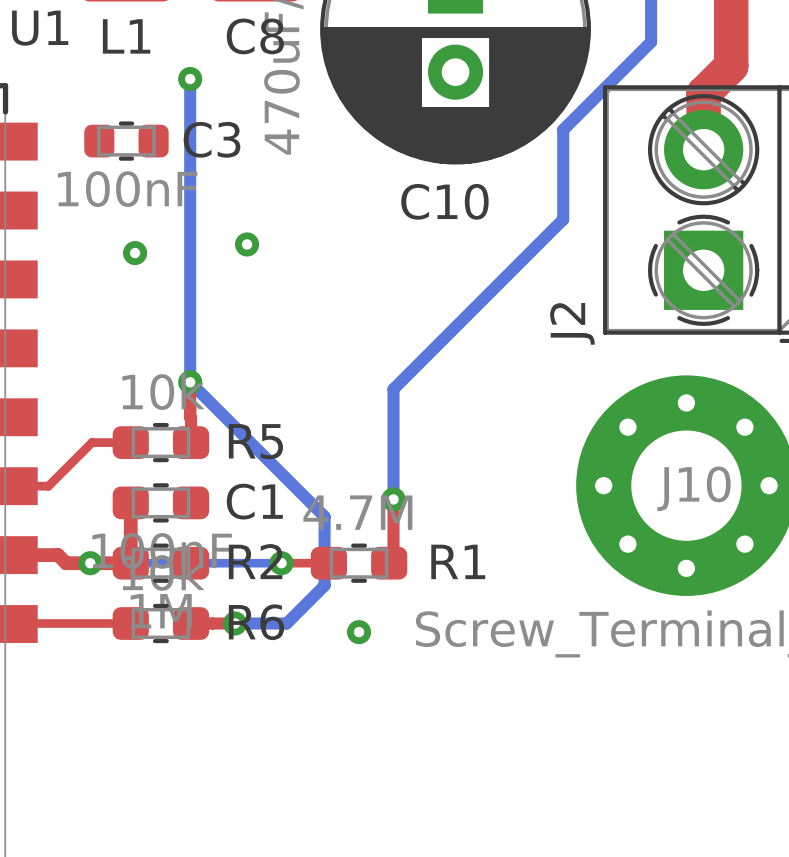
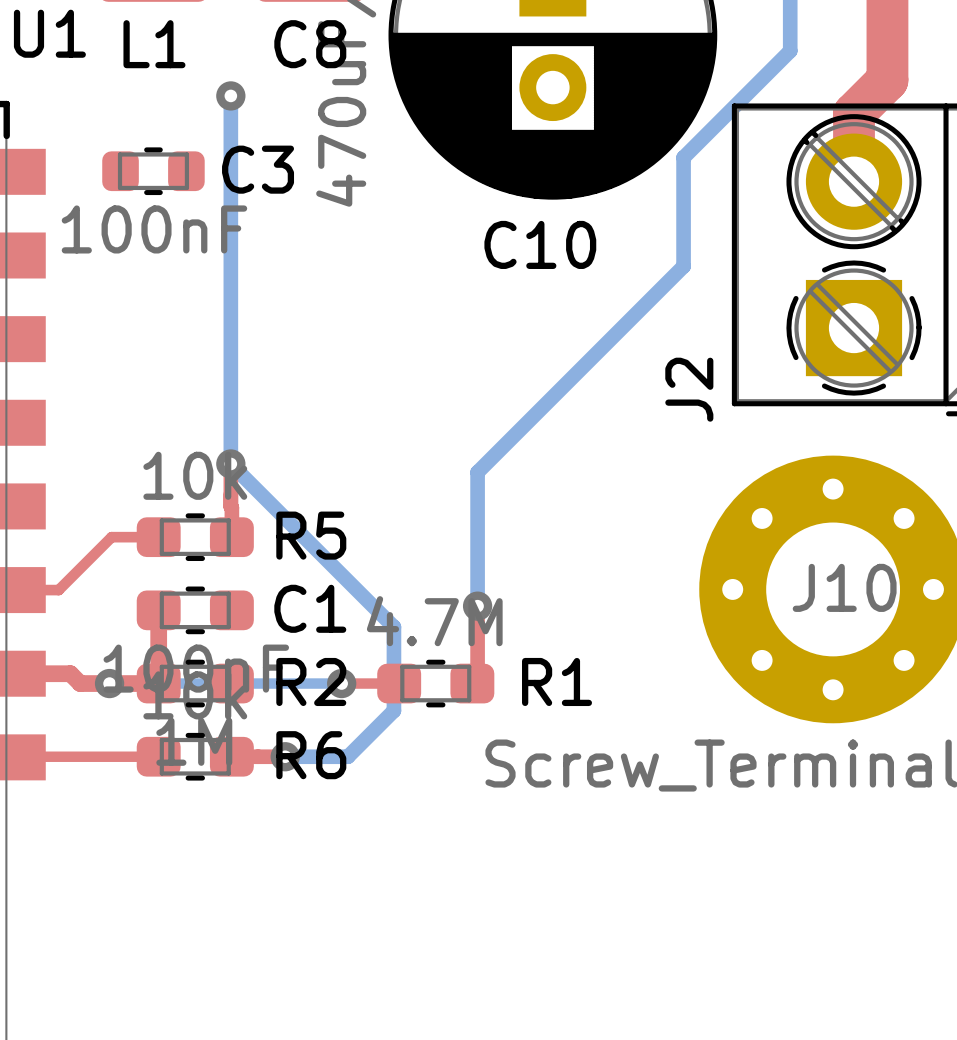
via: (247, 244) -> none
via: (135, 253) -> none
via: (359, 632) -> none

